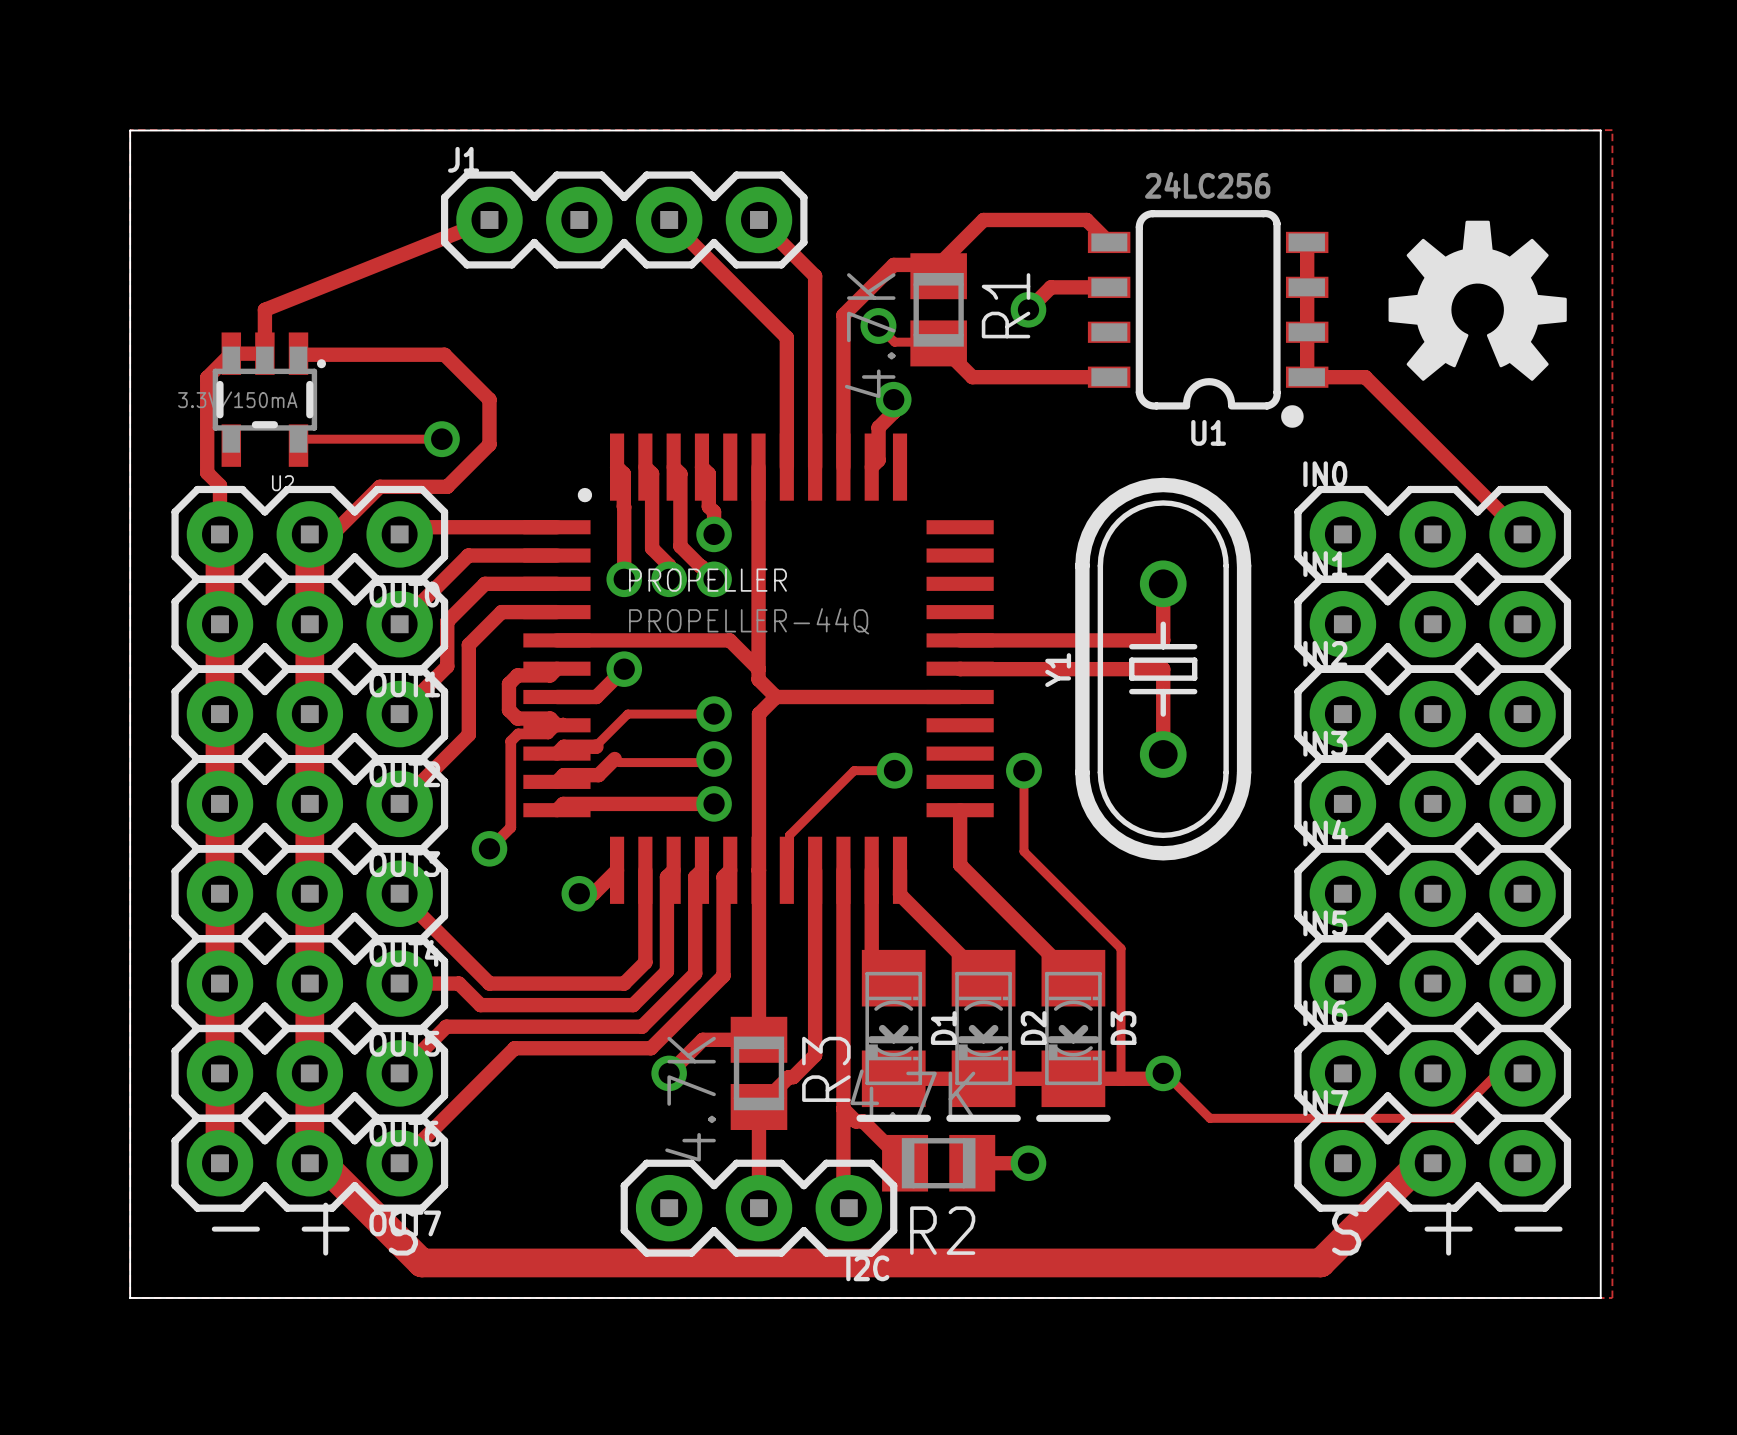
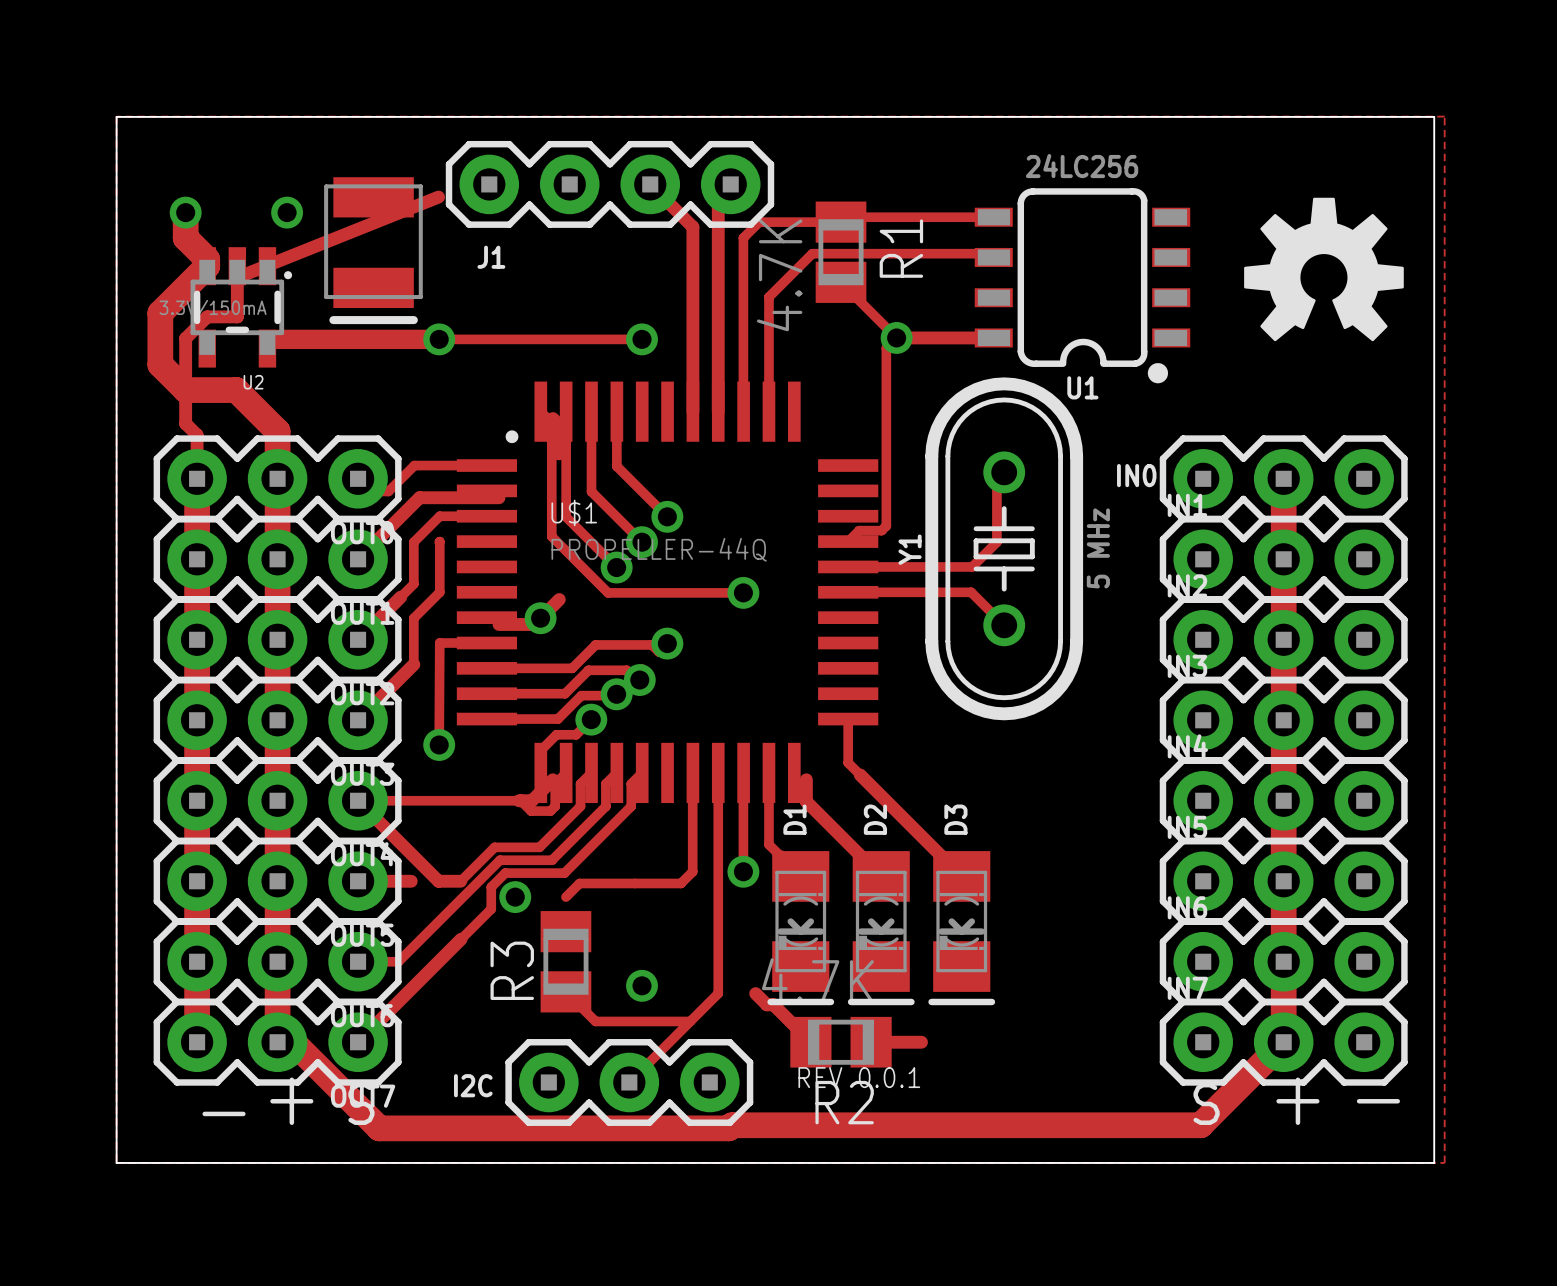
J1 name position: J1 (463, 159) -> J1 (491, 257)
track: none -> (650, 184) (692, 227) (692, 411)
track: none -> (730, 184) (718, 196) (718, 411)
J1 position: (624, 219) -> (610, 184)
track: (669, 219) (786, 337) (786, 467) -> none
track: (758, 219) (815, 276) (815, 467) -> none
via: none -> (185, 212)
via: none -> (287, 212)
track: (1109, 242) (1086, 219) (983, 219) (938, 264) (938, 276) (927, 264) (893, 264) (843, 315) (843, 467) -> (993, 217) (845, 217) (841, 222) (759, 222) (743, 237) (743, 411)
track: (1307, 242) (1307, 377) (1365, 377) (1522, 534) -> none
part: none -> (373, 250)
track: (1109, 287) (1050, 287) (1028, 309) -> (993, 257) (989, 253) (812, 253) (768, 297) (768, 411)
R1 position: (938, 309) -> (841, 252)
via: (1028, 309) -> none
track: none -> (841, 282) (896, 337) (886, 348) (886, 525) (881, 530) (859, 530) (848, 541)
track: (878, 325) (894, 342) (938, 343) (972, 377) (1000, 377) -> none
via: (878, 325) -> none
track: (298, 353) (444, 354) (489, 399) (489, 444) (447, 486) (379, 486) (332, 534) (309, 534) -> (181, 216) (185, 212) (185, 237) (207, 259) (207, 266) (160, 313) (160, 364) (185, 390) (236, 390) (277, 431) (277, 478)
via: none -> (896, 337)
via: none -> (439, 339)
track: none -> (642, 339) (276, 339) (267, 348)
via: none -> (642, 339)
U2 position: (269, 399) -> (241, 307)
track: (893, 399) (893, 412) (878, 427) (878, 460) (871, 467) -> none
via: (893, 399) -> none
track: (441, 439) (304, 439) (298, 445) -> none
via: (441, 439) -> none
track: none -> (540, 411) (551, 422) (551, 536) (608, 592) (743, 592)
track: none -> (566, 411) (566, 517) (616, 567)
track: none -> (591, 411) (591, 491) (642, 542)
track: none -> (616, 411) (616, 466) (667, 516)
track: (645, 467) (652, 473) (652, 548) (669, 565) (669, 579) -> none
track: (673, 467) (680, 473) (680, 546) (700, 566) -> none
track: (701, 467) (708, 473) (708, 506) (714, 511) (714, 534) -> none
track: (758, 467) (758, 679) (776, 697) -> none
IN0 name position: IN0 (1325, 474) -> IN0 (1136, 475)
track: (624, 506) (624, 579) -> none
track: (556, 527) (406, 527) (399, 534) -> (486, 465) (414, 465) (388, 491) (370, 491) (358, 478)
track: none -> (1004, 472) (996, 479) (996, 542) (972, 566) (848, 566)
via: (714, 534) -> none
via: none -> (667, 516)
via: (624, 579) -> none
via: (669, 579) -> none
via: (714, 579) -> none
PROPELLER name: PROPELLER (707, 580) -> U$1 (574, 512)
track: (556, 583) (484, 583) (447, 621) (447, 666) -> (486, 516) (439, 516) (413, 542) (413, 584) (400, 597)
track: (1163, 583) (1163, 640) (960, 640) -> none
via: none -> (642, 542)
track: (556, 612) (501, 612) (468, 644) (468, 734) (461, 741) -> (439, 542) (439, 592) (413, 618) (413, 664)
Y1 value: none -> 5 MHz (1098, 548)
via: none -> (616, 567)
track: (556, 640) (729, 640) (758, 669) -> none
via: none -> (743, 592)
track: none -> (848, 592) (971, 592) (1004, 625)
track: (556, 668) (550, 675) (517, 675) (508, 683) (508, 710) (517, 718) (550, 718) (556, 725) (563, 722) (548, 733) (518, 733) (510, 741) (510, 827) (489, 848) -> none
PROPELLER position: (758, 668) -> (667, 592)
via position: (624, 669) -> (540, 618)
track: (960, 669) (1163, 669) (1163, 754) -> none
Y1 position: (1163, 669) -> (1004, 548)
track: (776, 697) (758, 714) (758, 869) -> none
track: (776, 697) (960, 697) -> none
track: (714, 714) (627, 714) (595, 746) -> none
via position: (714, 714) -> (667, 643)
track: none -> (486, 643) (439, 643) (439, 744)
track: none -> (667, 643) (658, 651) (651, 644) (595, 644) (572, 668) (486, 668)
track: (596, 746) (563, 746) (556, 753) -> none
track: none -> (642, 668) (633, 677) (626, 670) (588, 670) (565, 693) (486, 693)
track: (714, 758) (708, 762) (619, 762) (614, 758) (598, 775) (563, 775) (556, 781) -> none
track: (894, 770) (854, 770) (789, 835) (789, 867) (786, 870) -> none
via: (894, 770) -> none
track: (1024, 770) (1024, 851) (1121, 948) (1121, 1078) -> none
via: (1024, 770) -> none
track: none -> (616, 694) (581, 695) (557, 719) (486, 719)
via: none -> (616, 694)
track: none -> (591, 719) (576, 734) (556, 734) (540, 750) (540, 772)
via: none -> (591, 719)
track: (714, 803) (563, 803) (556, 810) -> none
via: (714, 803) -> none
track: (960, 810) (960, 864) -> (848, 719) (848, 762) (860, 774)
via position: (489, 848) -> (439, 744)
track: none -> (566, 772) (555, 783) (555, 806) (550, 811) (531, 811) (520, 800) (358, 800)
track: none -> (692, 773) (692, 871) (680, 883) (579, 883) (565, 897)
track: none -> (718, 772) (718, 993) (629, 1082)
track: none -> (743, 772) (743, 871)
track: (645, 870) (645, 962) (624, 983) (514, 983) -> (591, 772) (580, 783) (580, 806) (539, 847) (494, 847) (460, 881)
track: (673, 870) (666, 877) (666, 971) (633, 1005) (480, 1005) (458, 983) -> none
track: (701, 870) (695, 877) (695, 973) (642, 1026) (446, 1026) (399, 1073) -> (616, 772) (605, 783) (605, 806) (552, 860) (499, 860) (398, 961) (358, 961)
track: (730, 870) (723, 877) (723, 975) (651, 1048) (514, 1048) -> (642, 772) (631, 783) (631, 806) (564, 873) (505, 873) (491, 887) (491, 909) (461, 939)
track: (758, 870) (758, 1039) (702, 1039) (669, 1073) -> none
track: (815, 870) (815, 1055) (793, 1077) (788, 1077) (758, 1107) (758, 1208) -> none
track: (843, 870) (843, 1202) (848, 1208) -> none
track: (871, 870) (871, 956) -> (768, 772) (768, 844) (781, 856)
via: (579, 893) -> none
via: none -> (743, 871)
via: none -> (515, 897)
D1 name position: D1 (943, 1028) -> D1 (794, 819)
D2 name position: D2 (1033, 1028) -> D2 (875, 819)
D3 name position: D3 (1123, 1028) -> D3 (955, 819)
R3 name position: R3 (826, 1069) -> R3 (512, 970)
via position: (669, 1073) -> (642, 985)
R3 position: (758, 1073) -> (565, 961)
via: (1163, 1073) -> none
track: (1522, 1073) (1517, 1077) (1492, 1077) (1452, 1118) (1209, 1118) (1163, 1073) (1157, 1078) (893, 1078) -> none
R3 value: 4.7K (690, 1099) -> none
track: none -> (565, 991) (595, 1021) (690, 1021)
track: (322, 1163) (421, 1262) (1320, 1262) (1420, 1163) (1432, 1163) -> (288, 1042) (293, 1042) (379, 1128) (728, 1128) (731, 1125) (1200, 1125) (1283, 1042) (1283, 478)
via: (1028, 1163) -> none
text: none -> REV 0.0.1 (859, 1077)
I2C position: (758, 1208) -> (629, 1082)
text position: - (235, 1229) -> - (224, 1113)
I2C name position: I2C (867, 1268) -> I2C (473, 1085)

